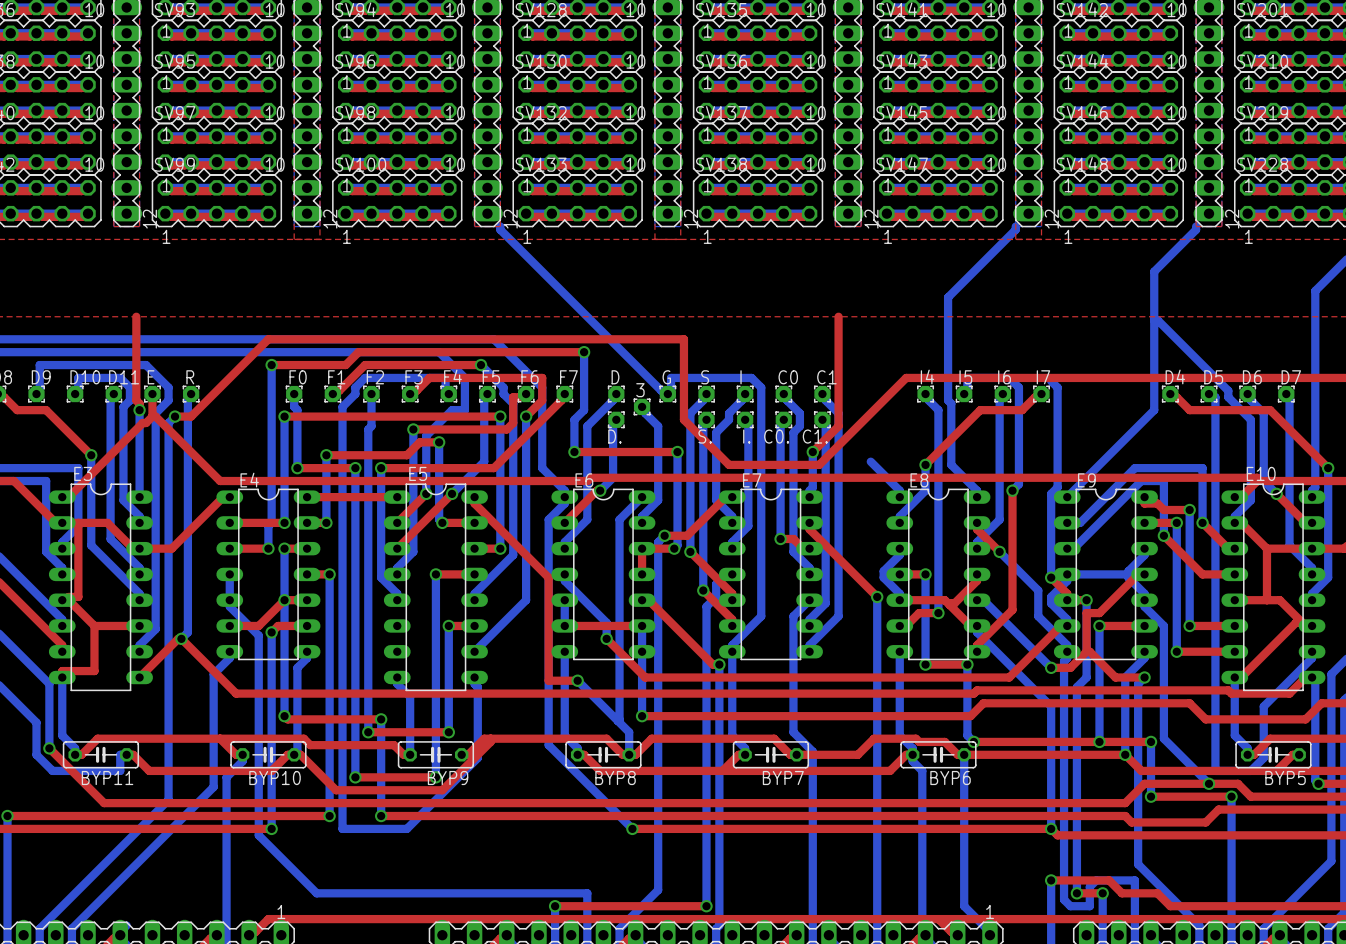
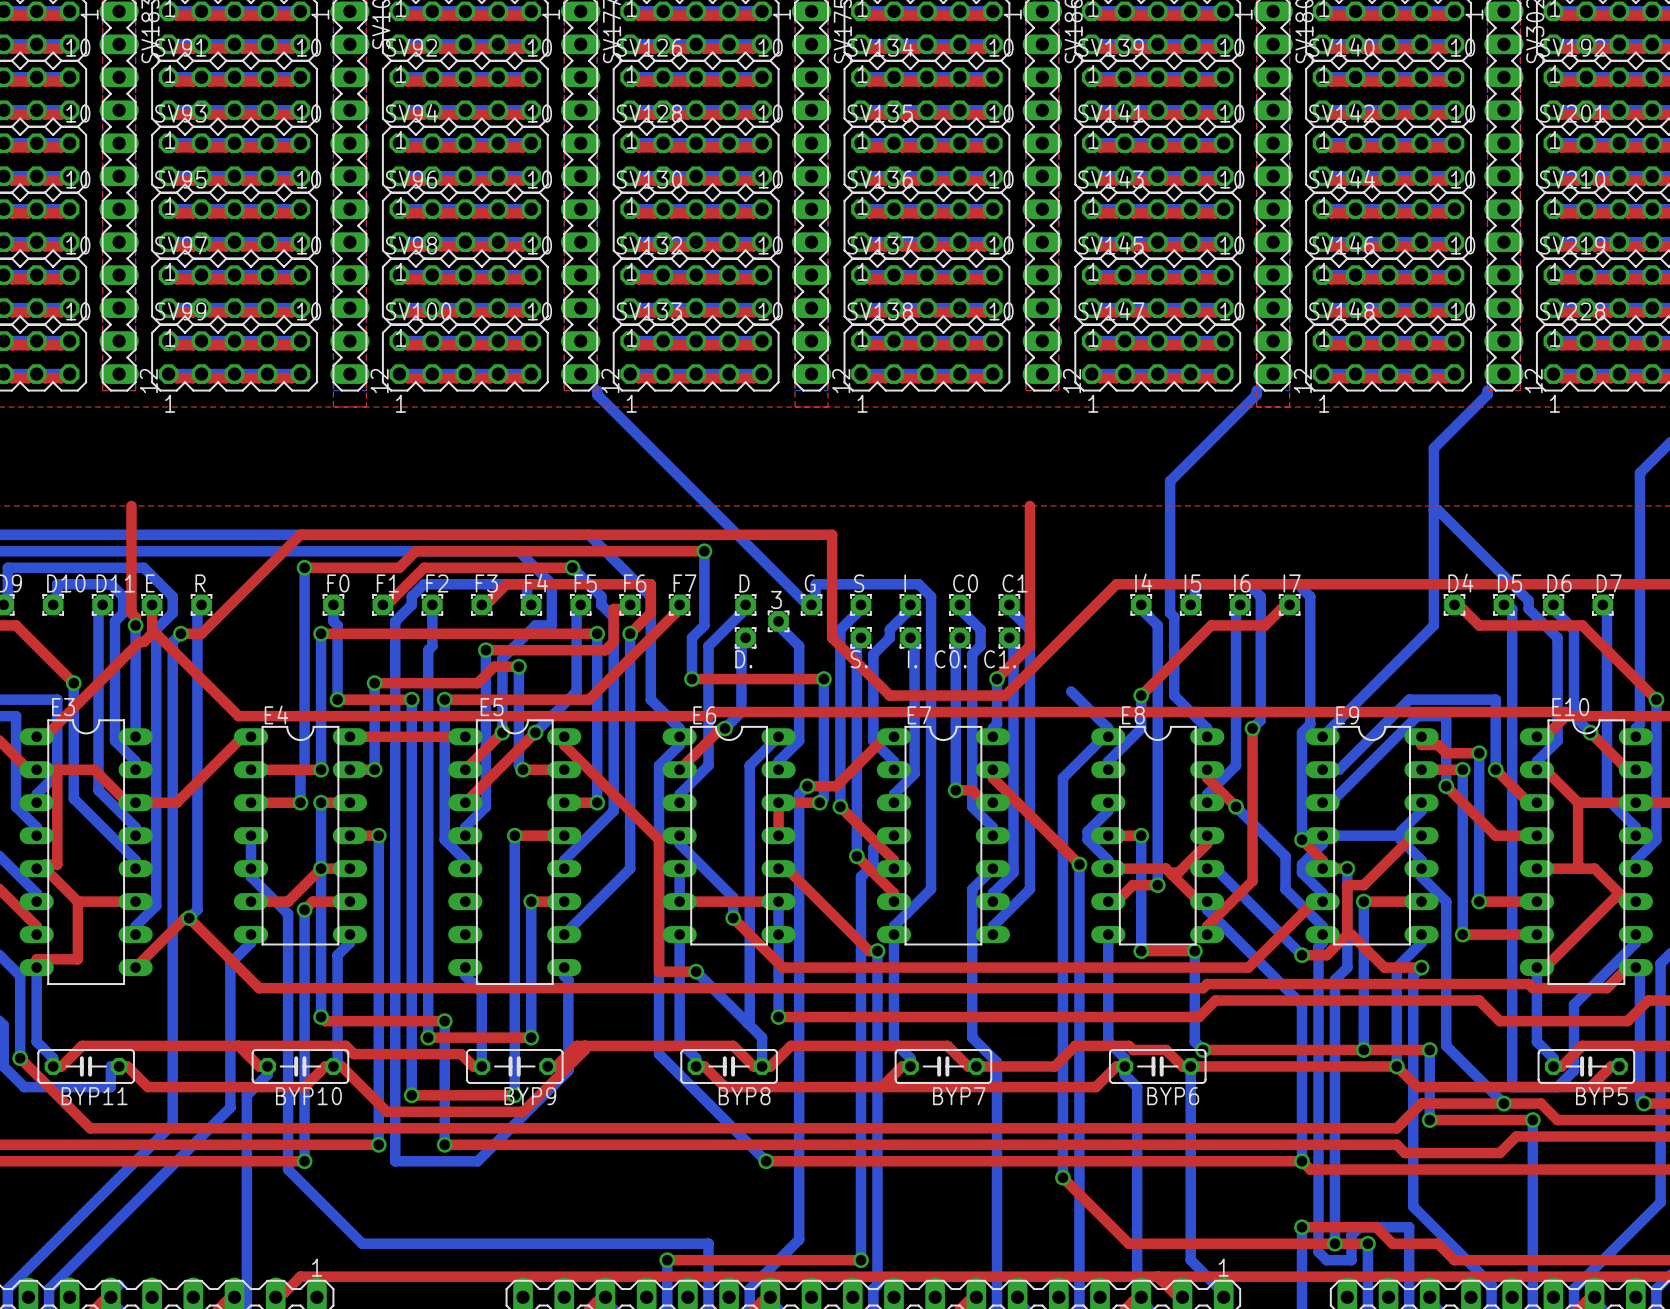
bottom track: none -> (1108, 736) (1104, 736) (1062, 777) (1062, 1177)
top track: none -> (1062, 1177) (1128, 1243) (1334, 1243)
via: none -> (1062, 1177)

